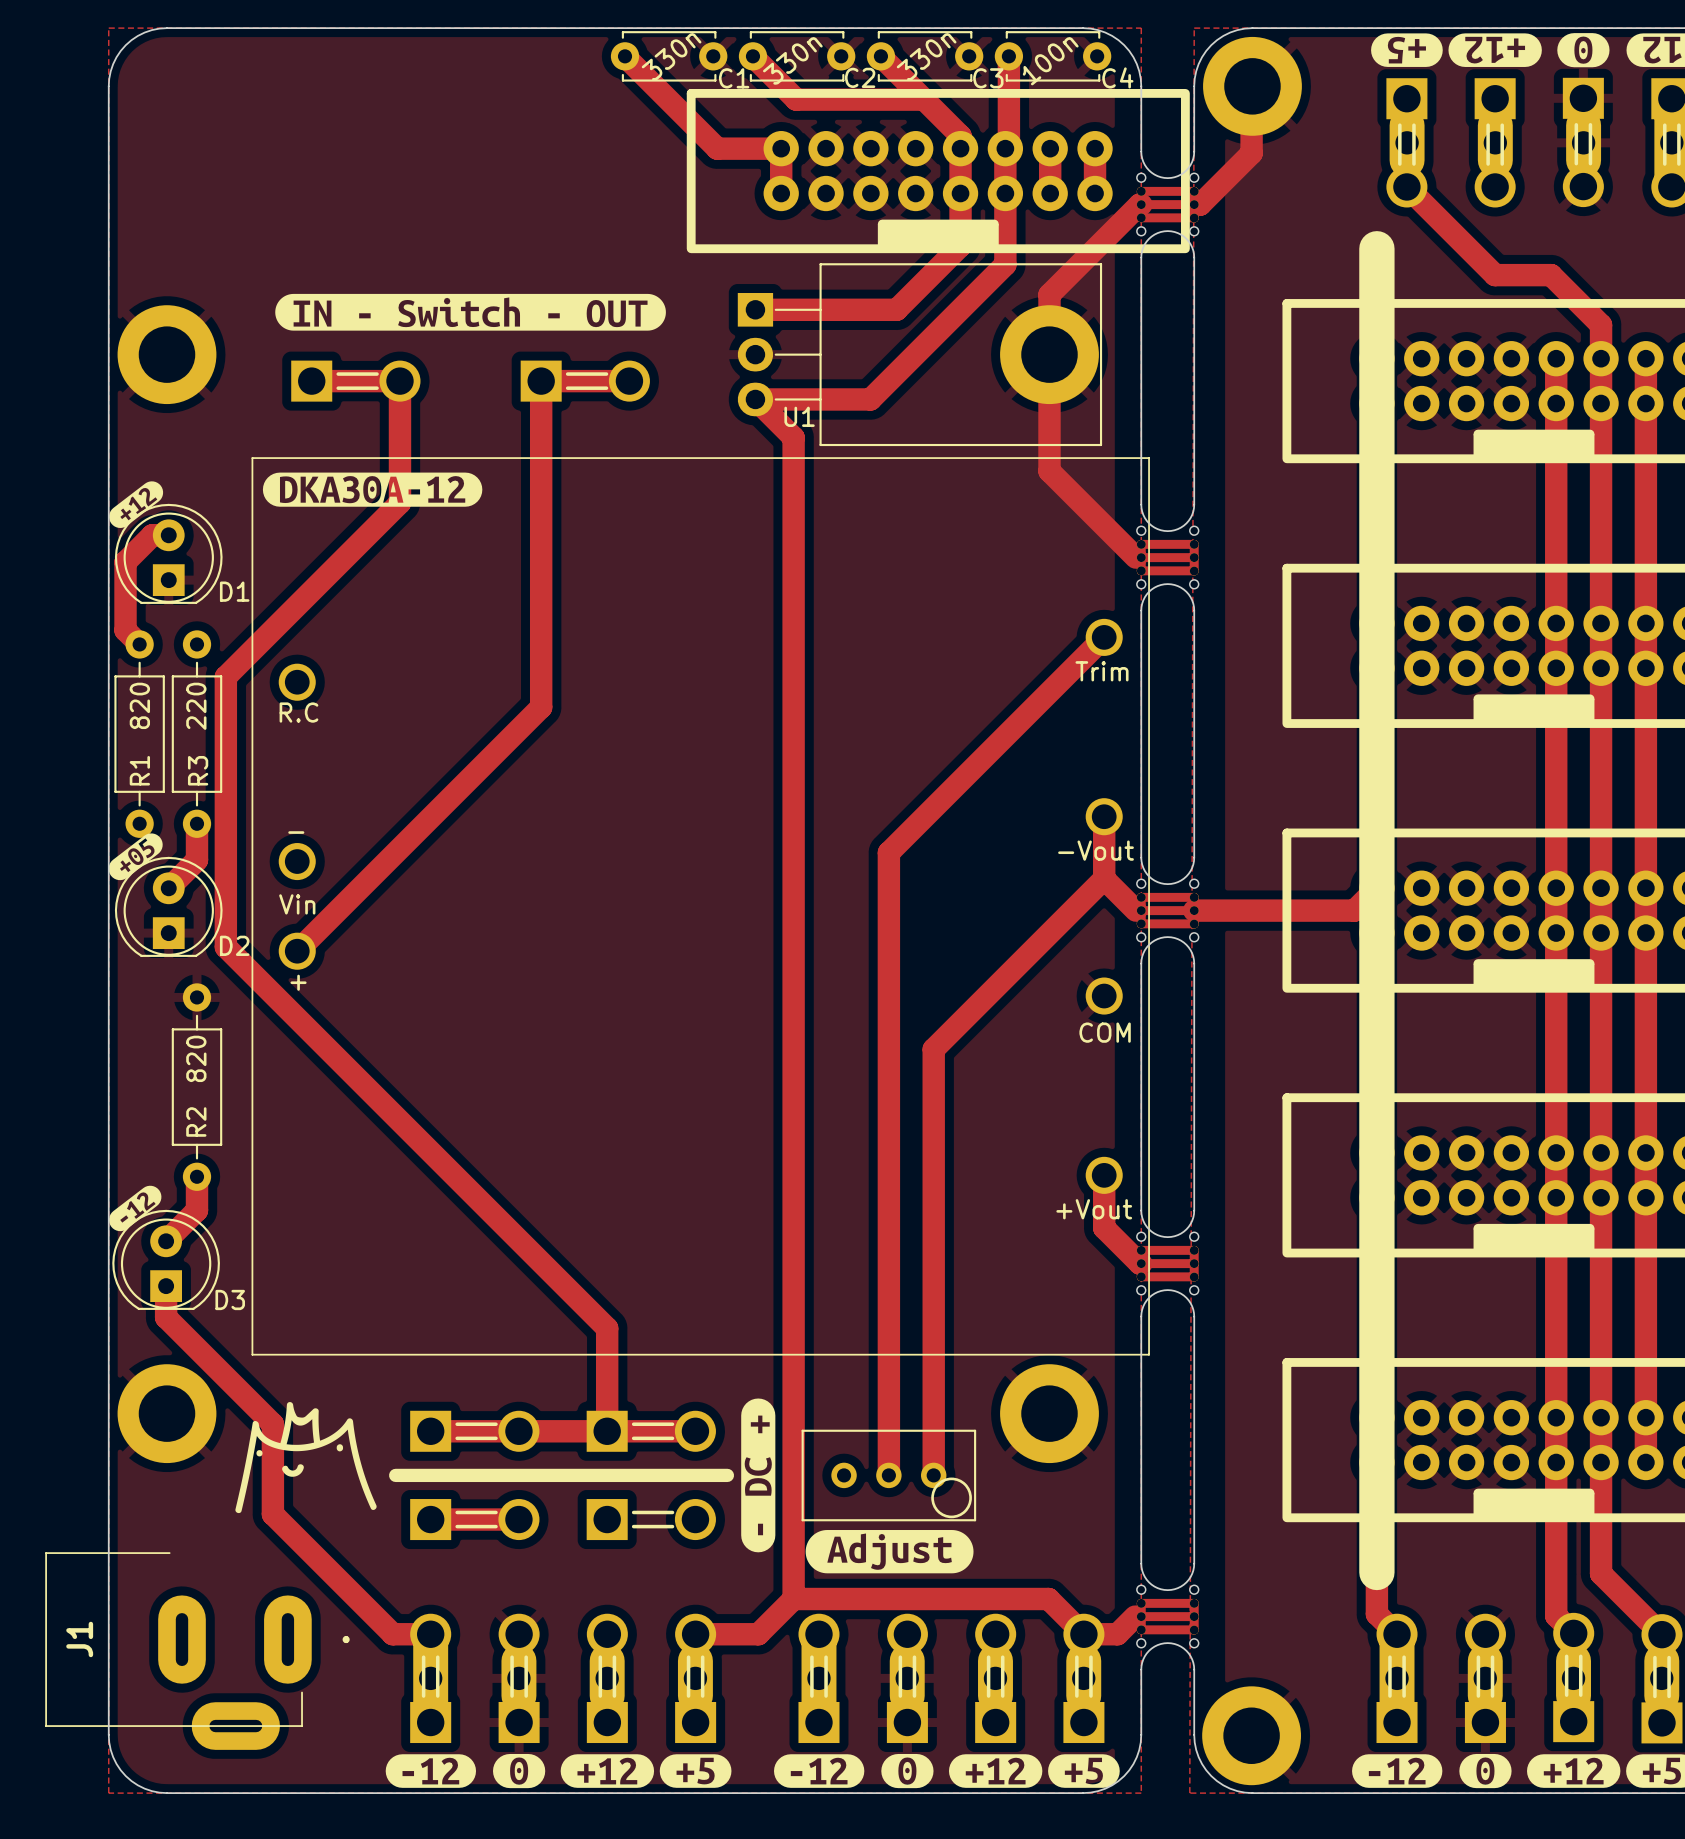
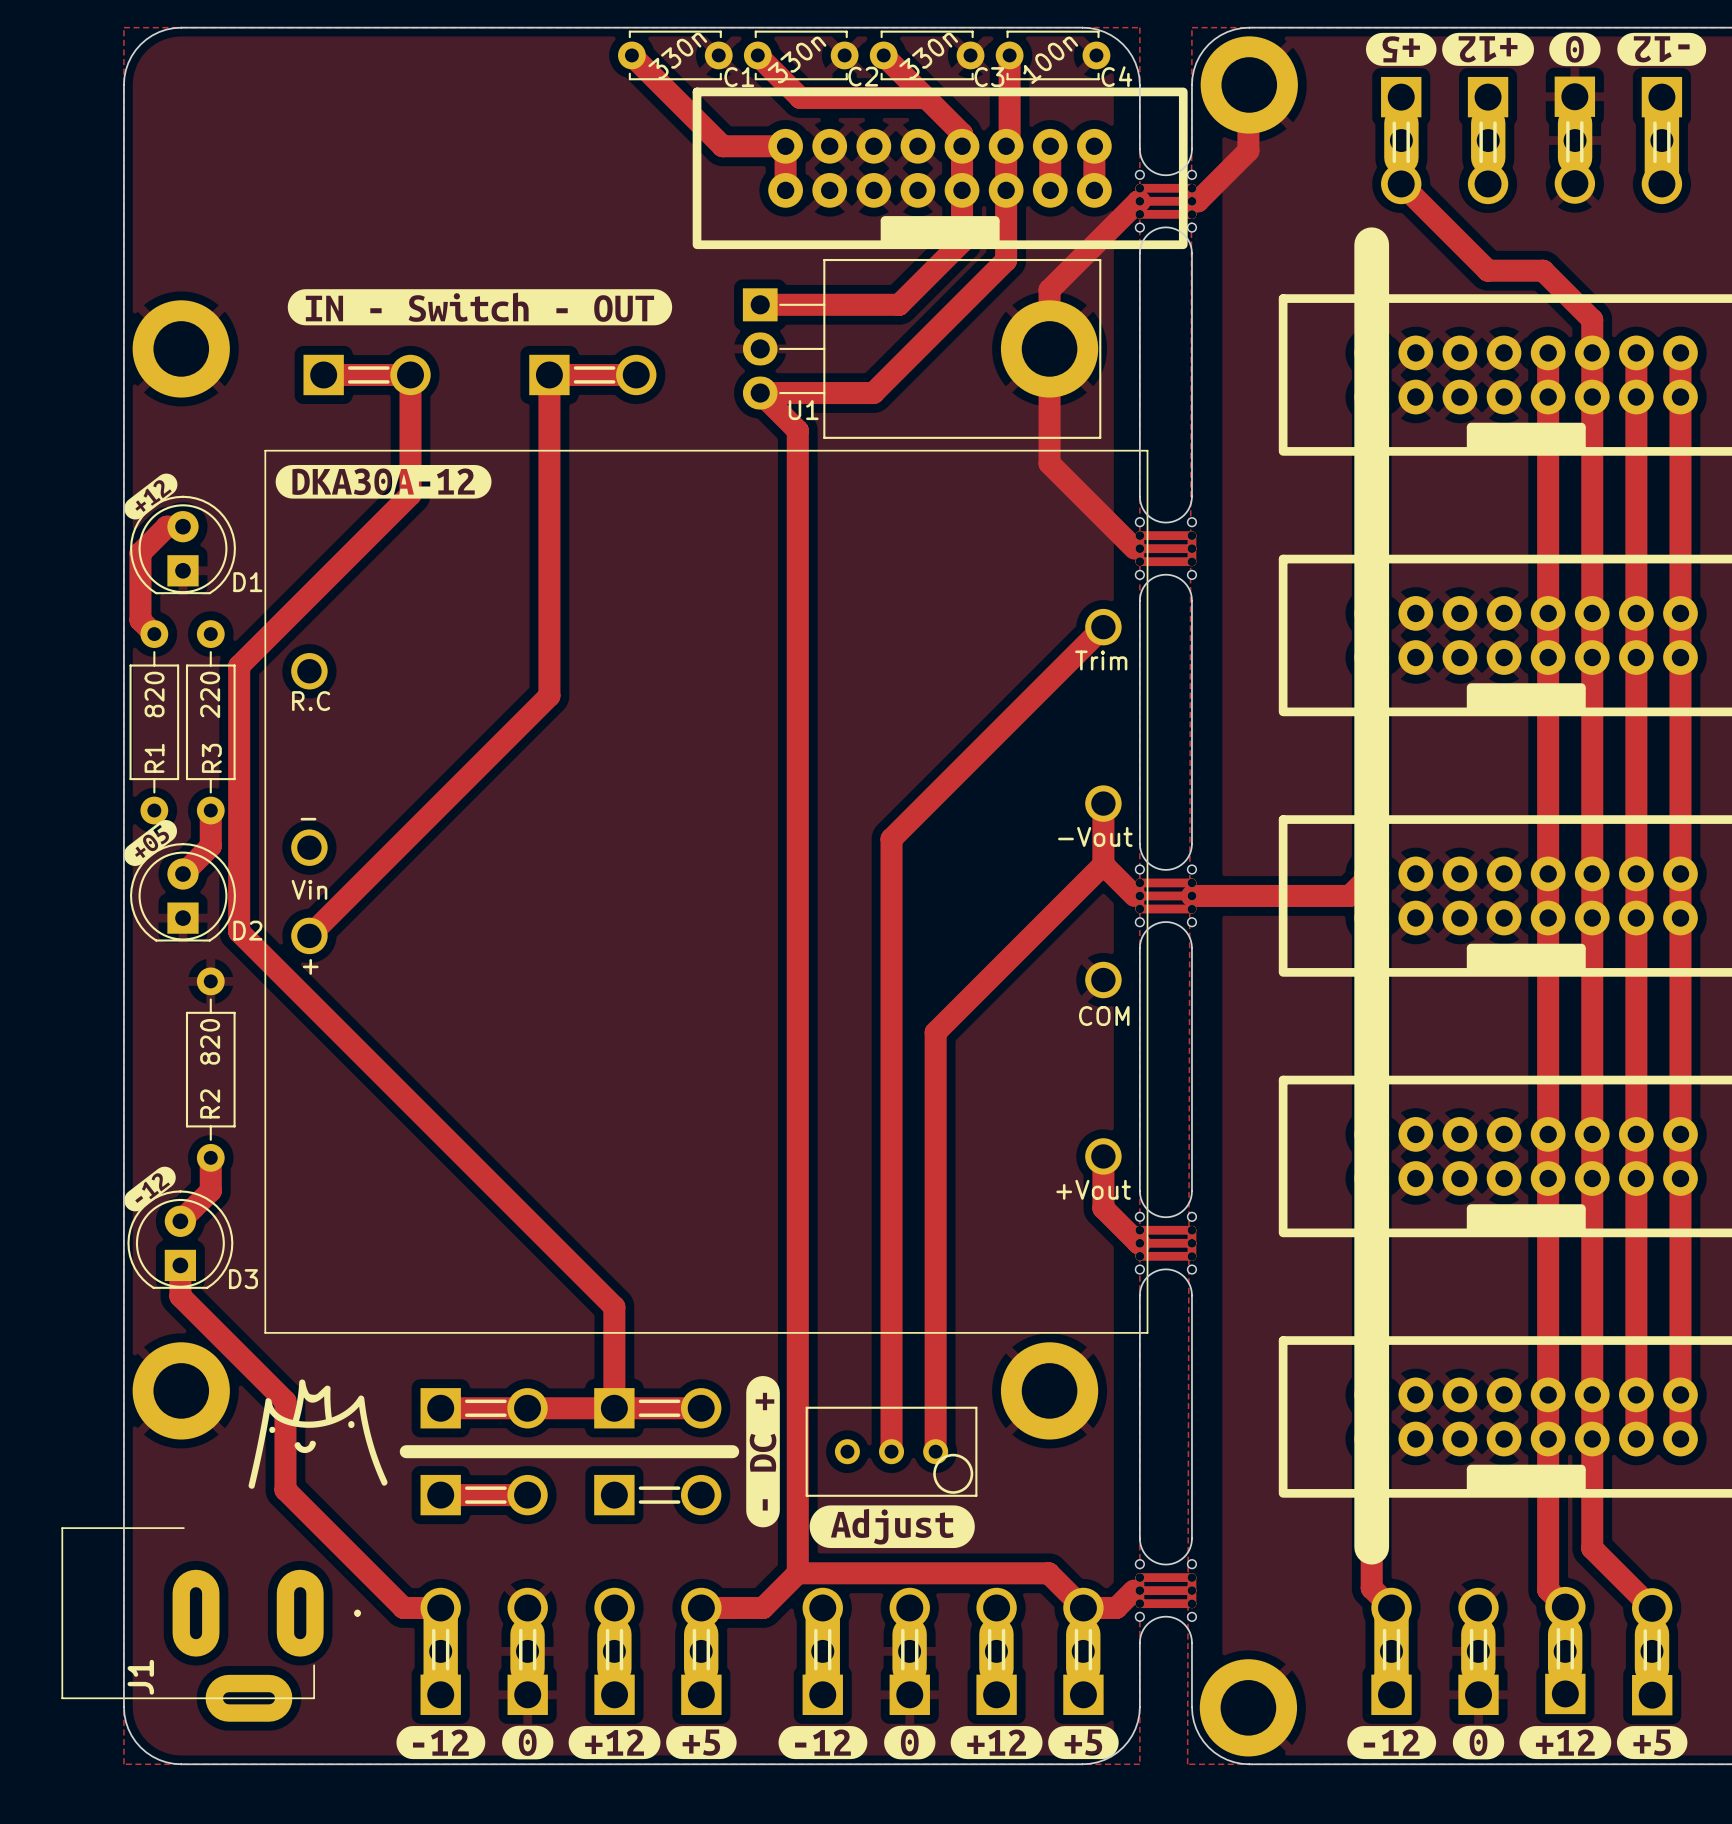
J1 name position: J1 (79, 1639) -> J1 (140, 1677)

